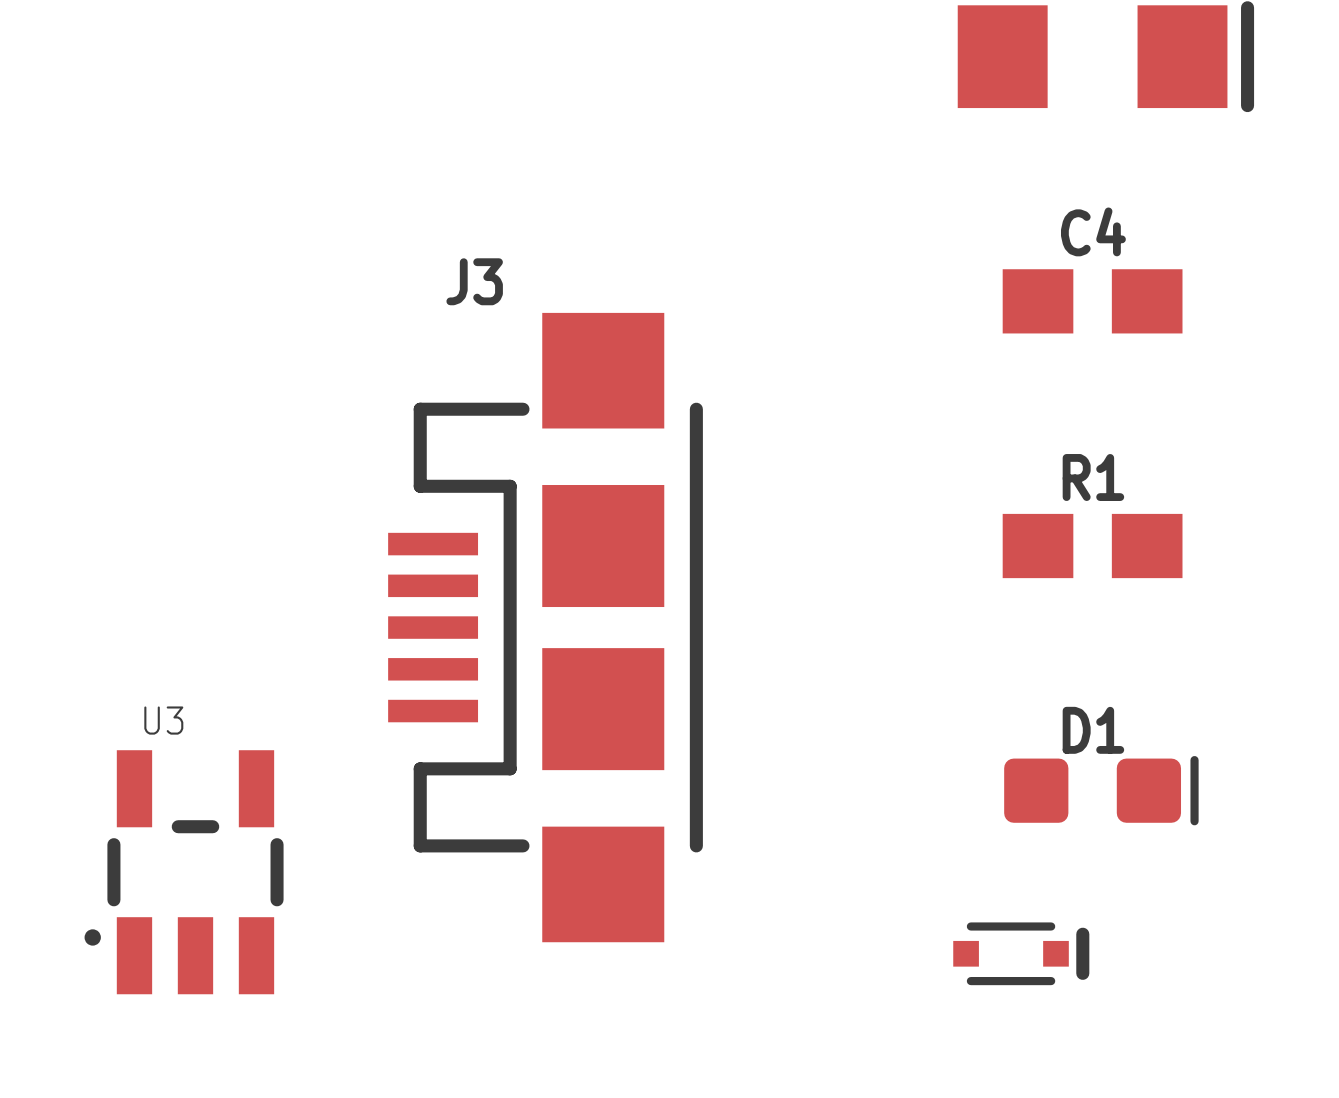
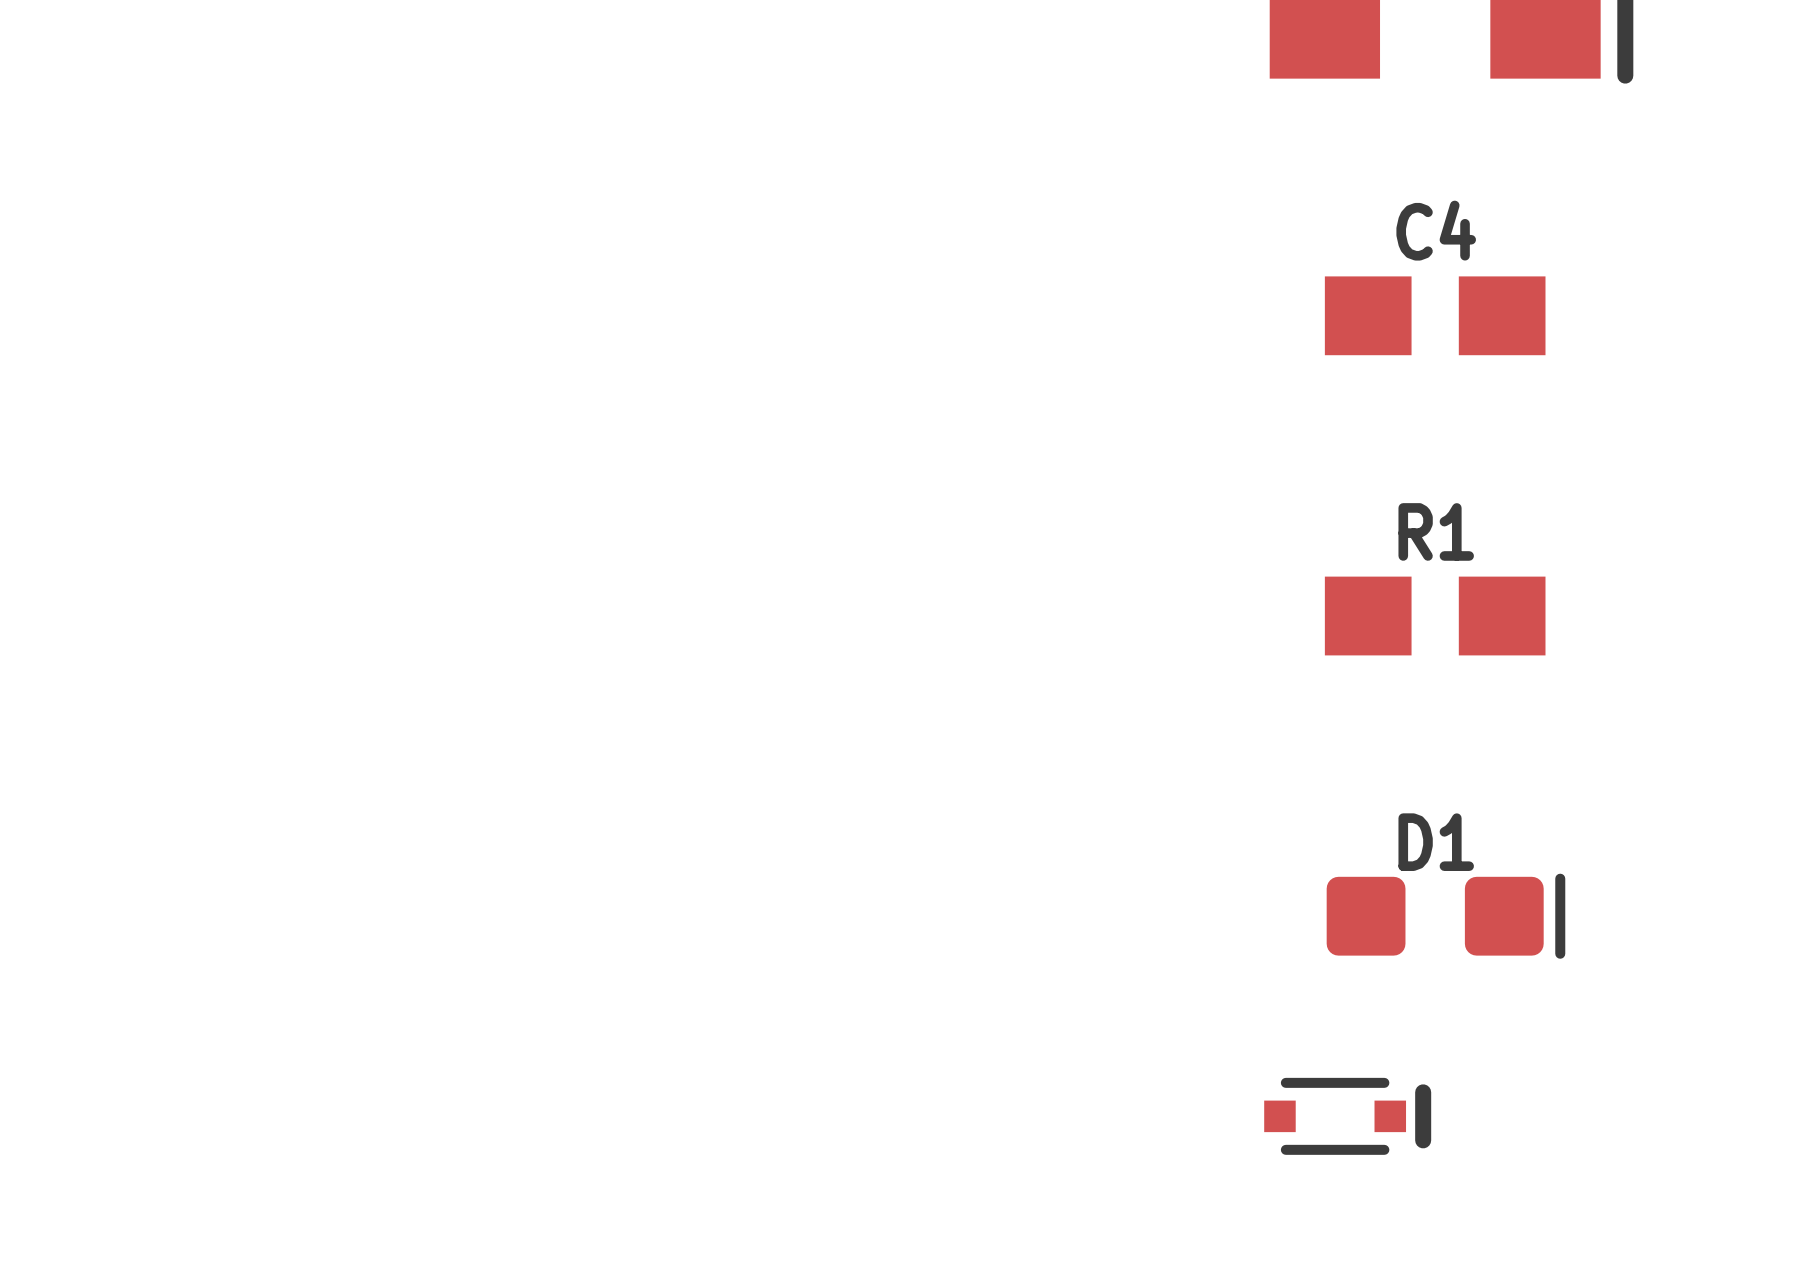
J3: (545, 627) -> none
U3: (184, 872) -> none

